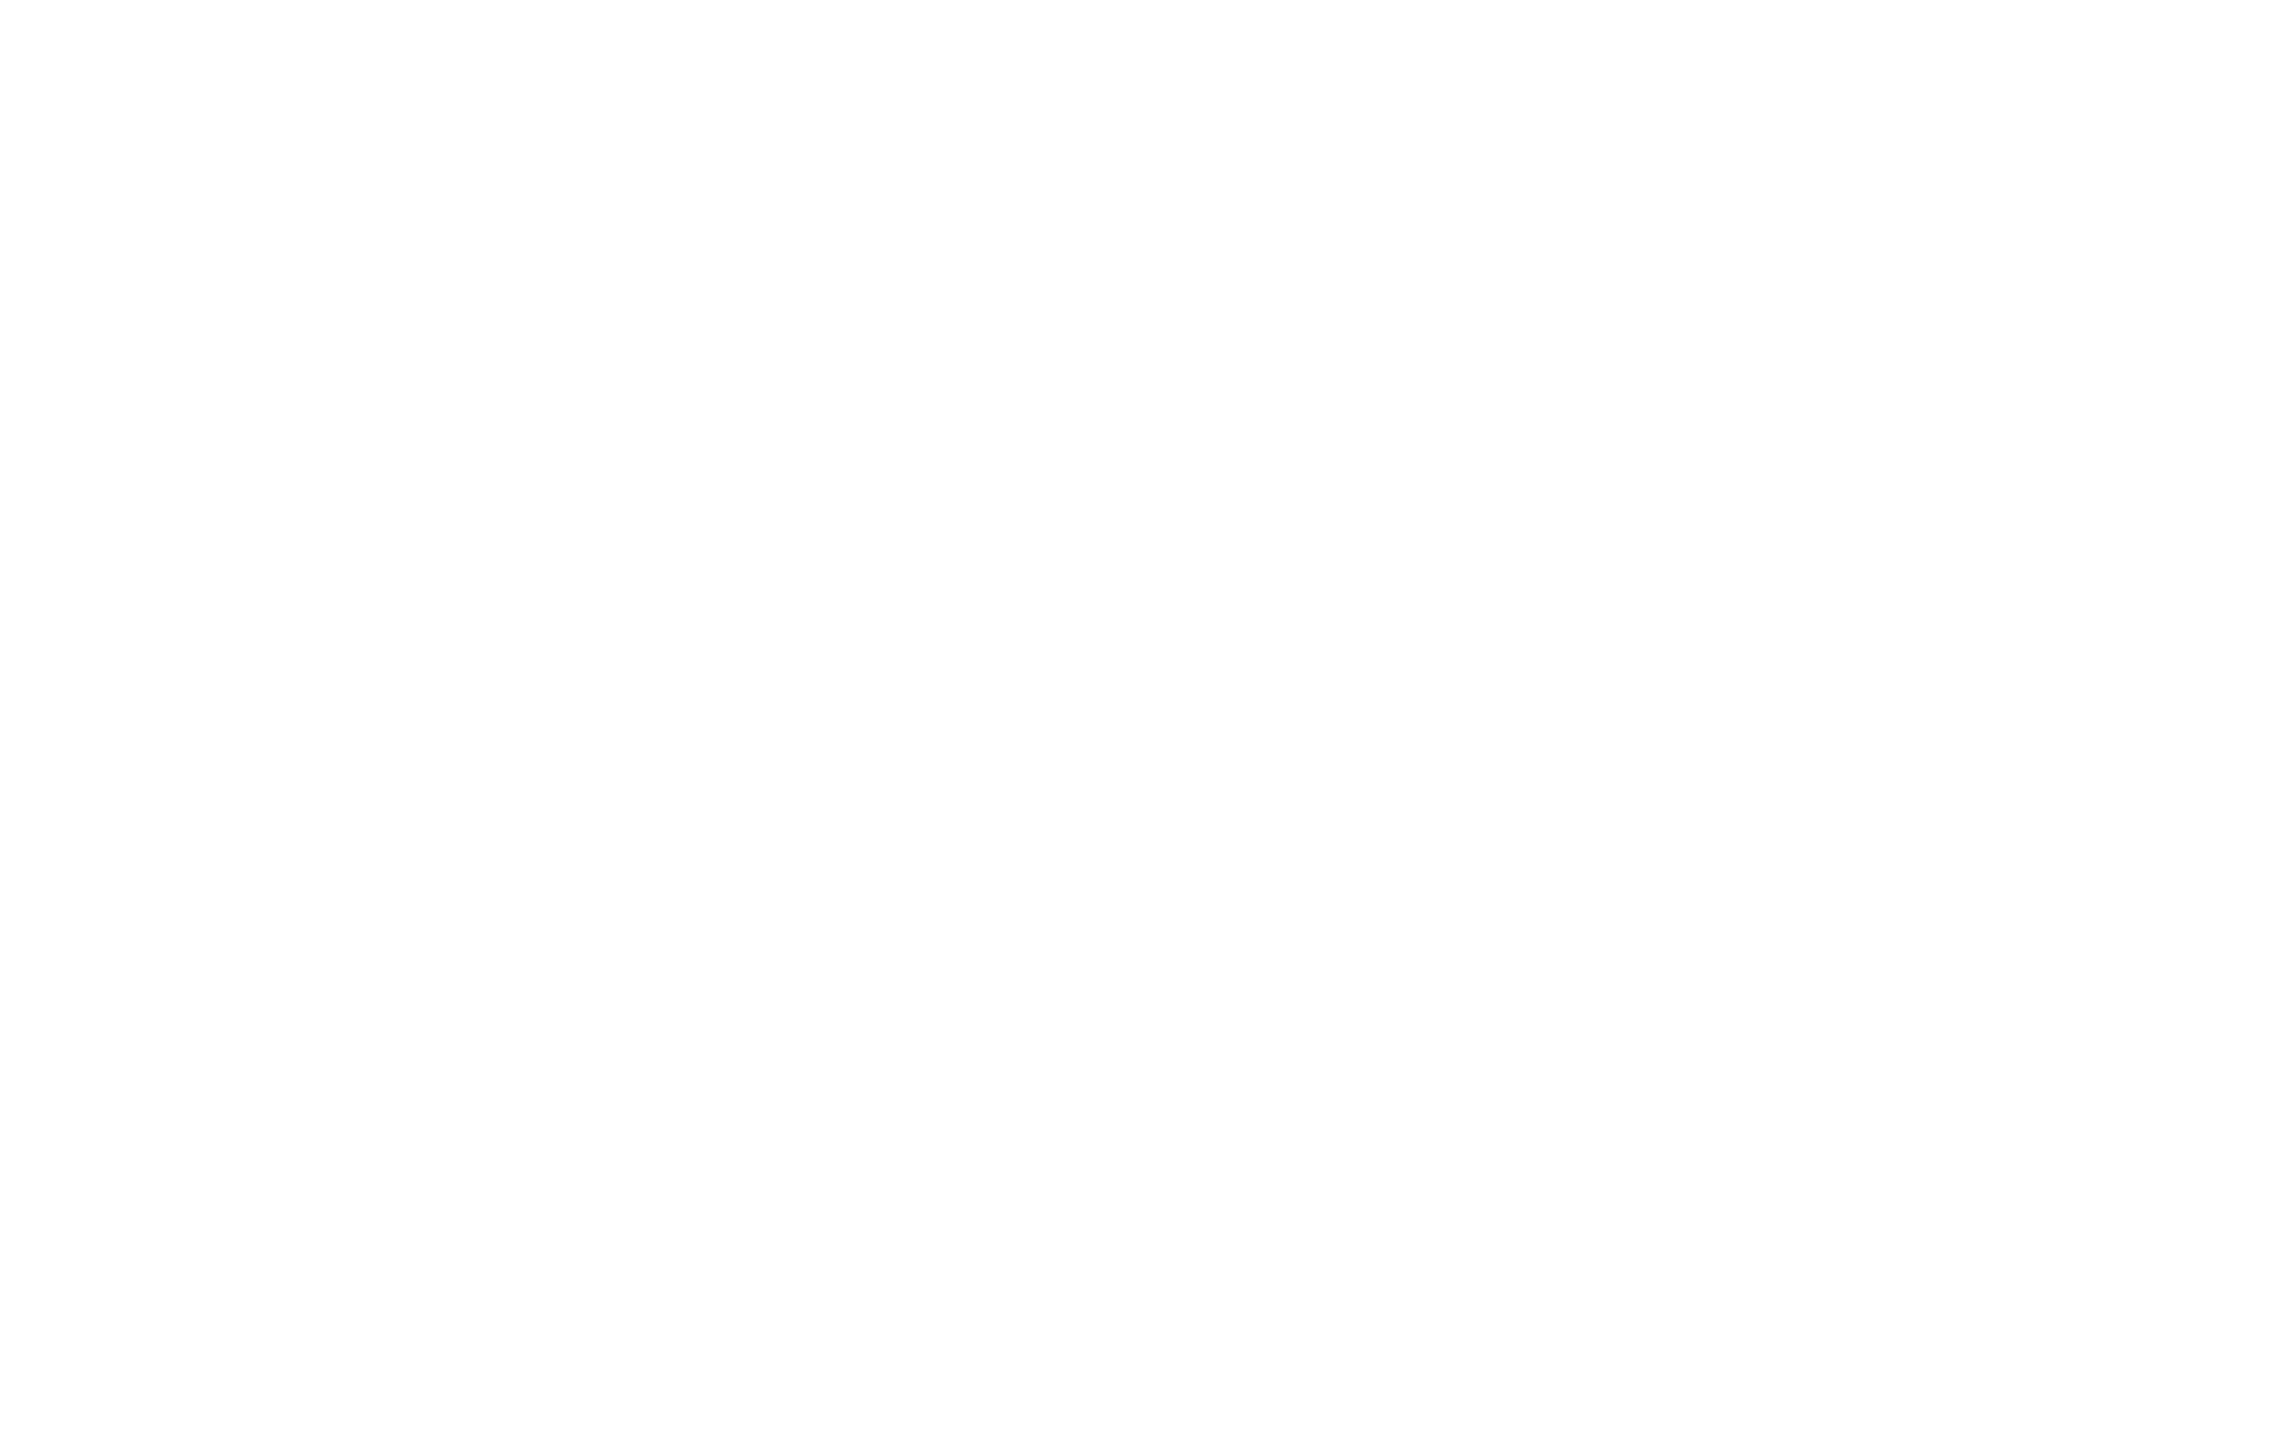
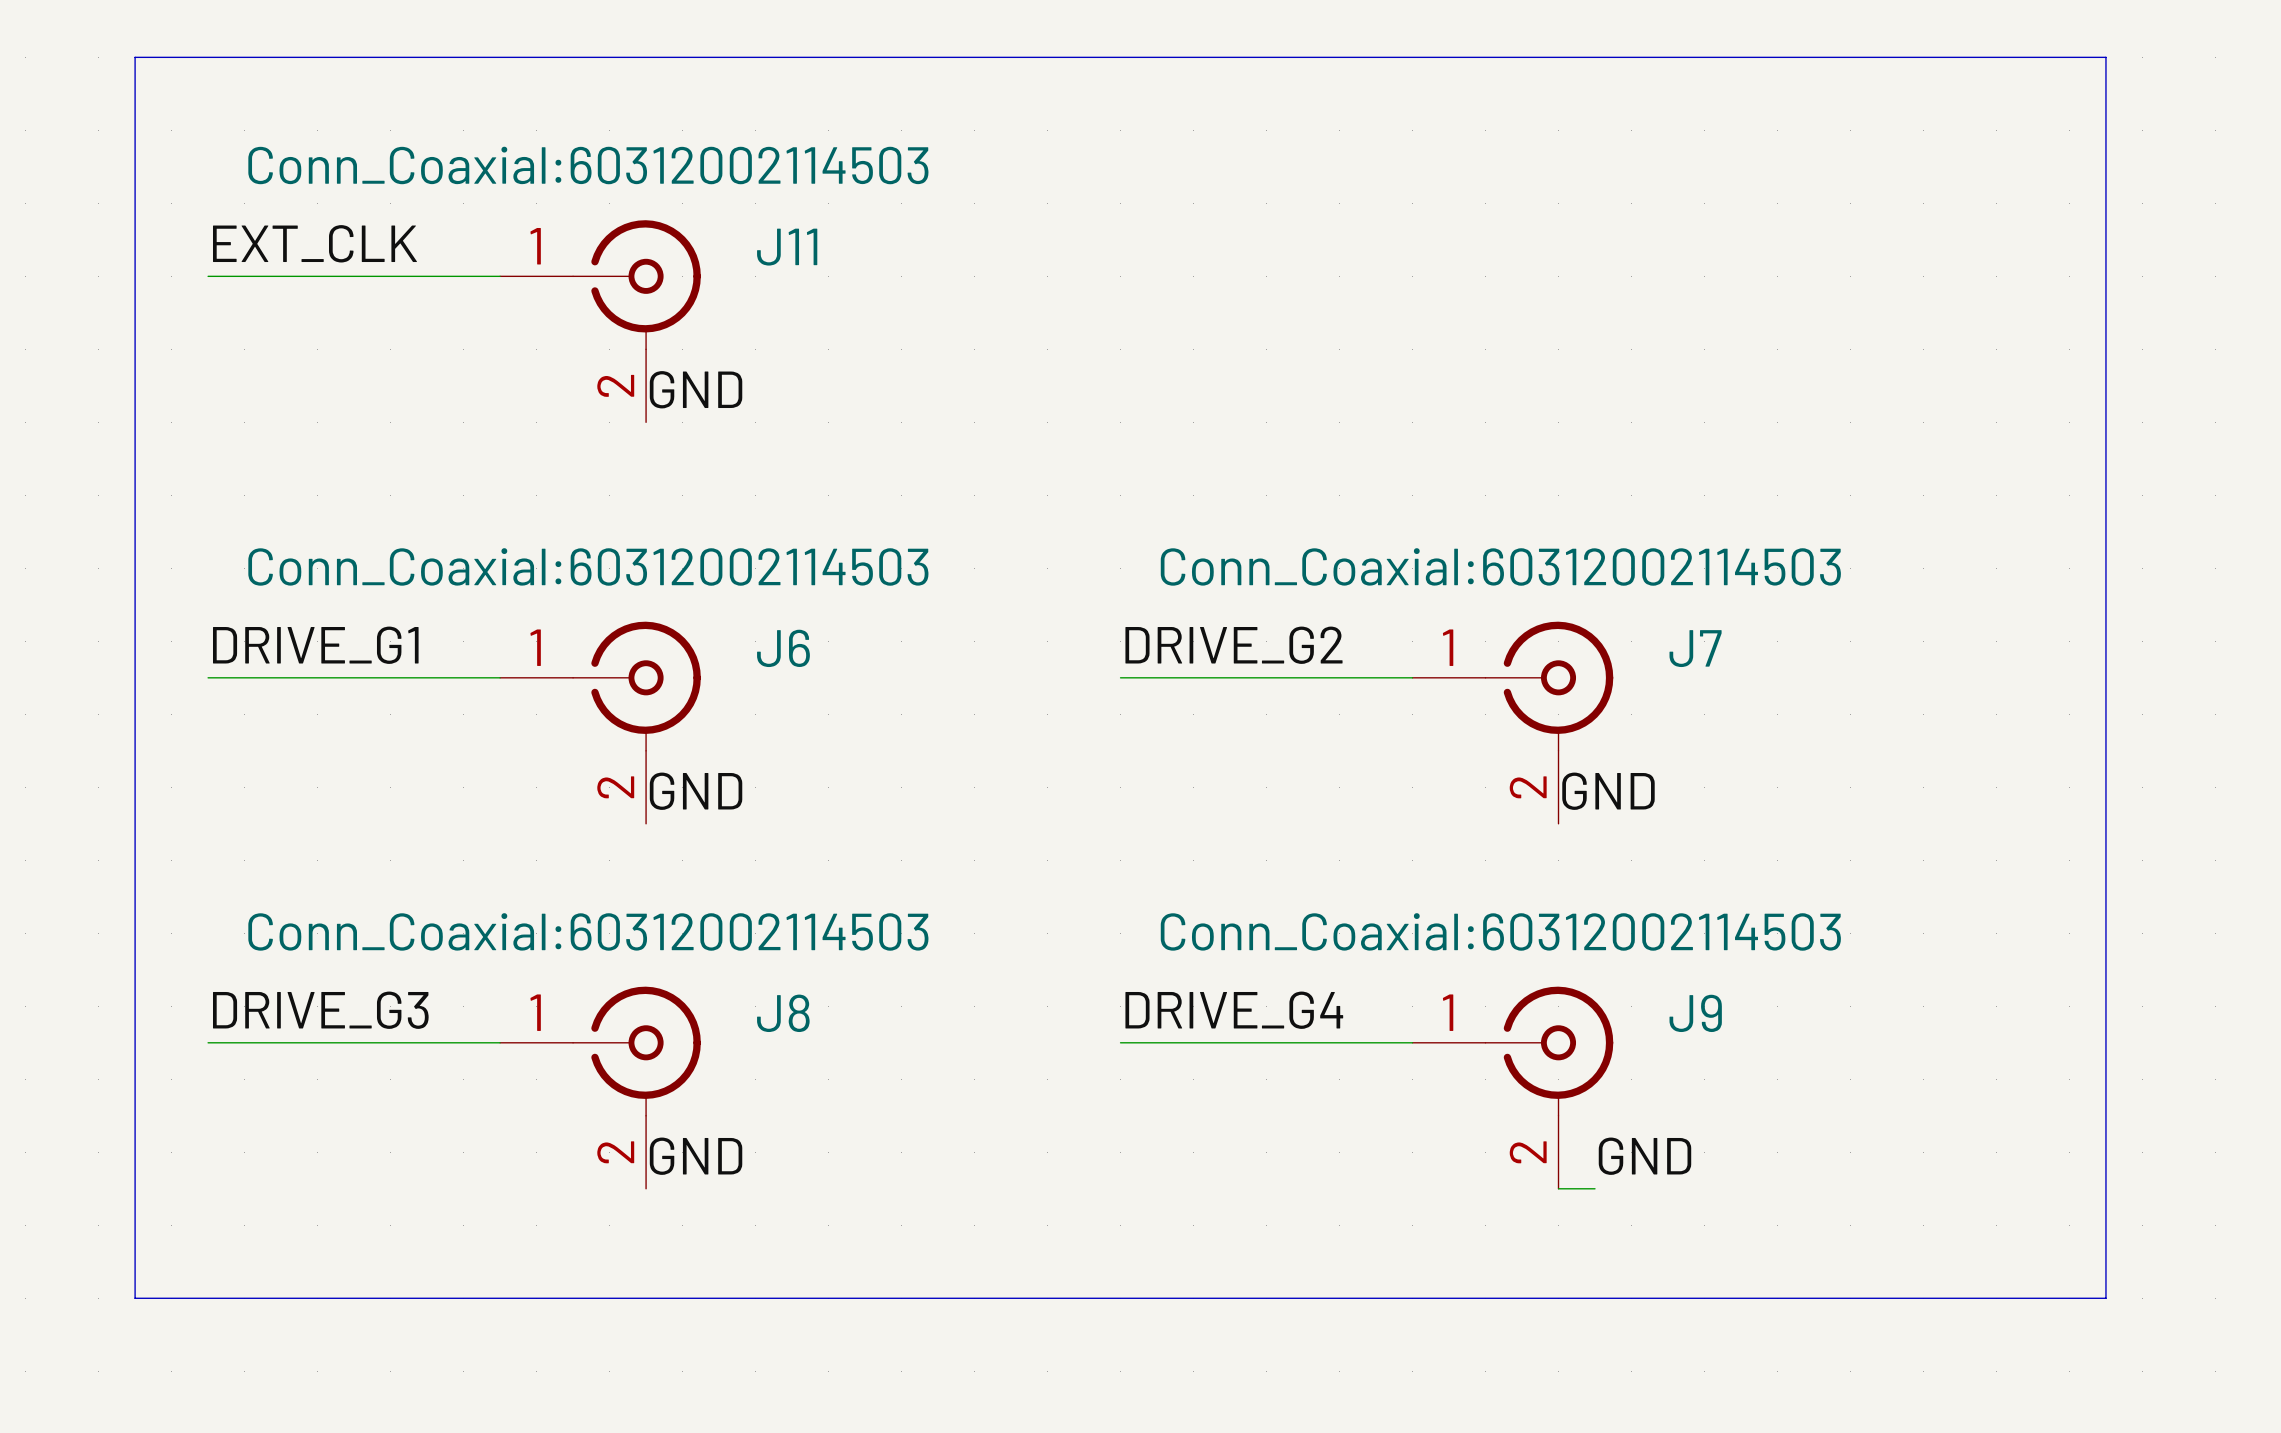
line: none -> (135, 57) (2105, 57) (2105, 1298) (135, 1298) (135, 57)
label: none -> EXT_CLK (314, 243)
wire: none -> (208, 276) (500, 276)
J11: none -> Conn_Coaxial:60312002114503 (600, 321)
label: none -> GND (696, 389)
label: none -> DRIVE_G1 (315, 645)
label: none -> DRIVE_G2 (1233, 645)
wire: none -> (208, 677) (500, 677)
wire: none -> (1120, 677) (1412, 677)
J6: none -> Conn_Coaxial:60312002114503 (600, 722)
J7: none -> Conn_Coaxial:60312002114503 (1512, 722)
label: none -> GND (696, 791)
label: none -> GND (1608, 791)
label: none -> DRIVE_G3 (320, 1010)
label: none -> DRIVE_G4 (1234, 1010)
wire: none -> (208, 1042) (500, 1042)
wire: none -> (1120, 1042) (1412, 1042)
J8: none -> Conn_Coaxial:60312002114503 (600, 1087)
J9: none -> Conn_Coaxial:60312002114503 (1512, 1087)
label: none -> GND (696, 1156)
label: none -> GND (1644, 1156)
wire: none -> (1558, 1188) (1595, 1188)

